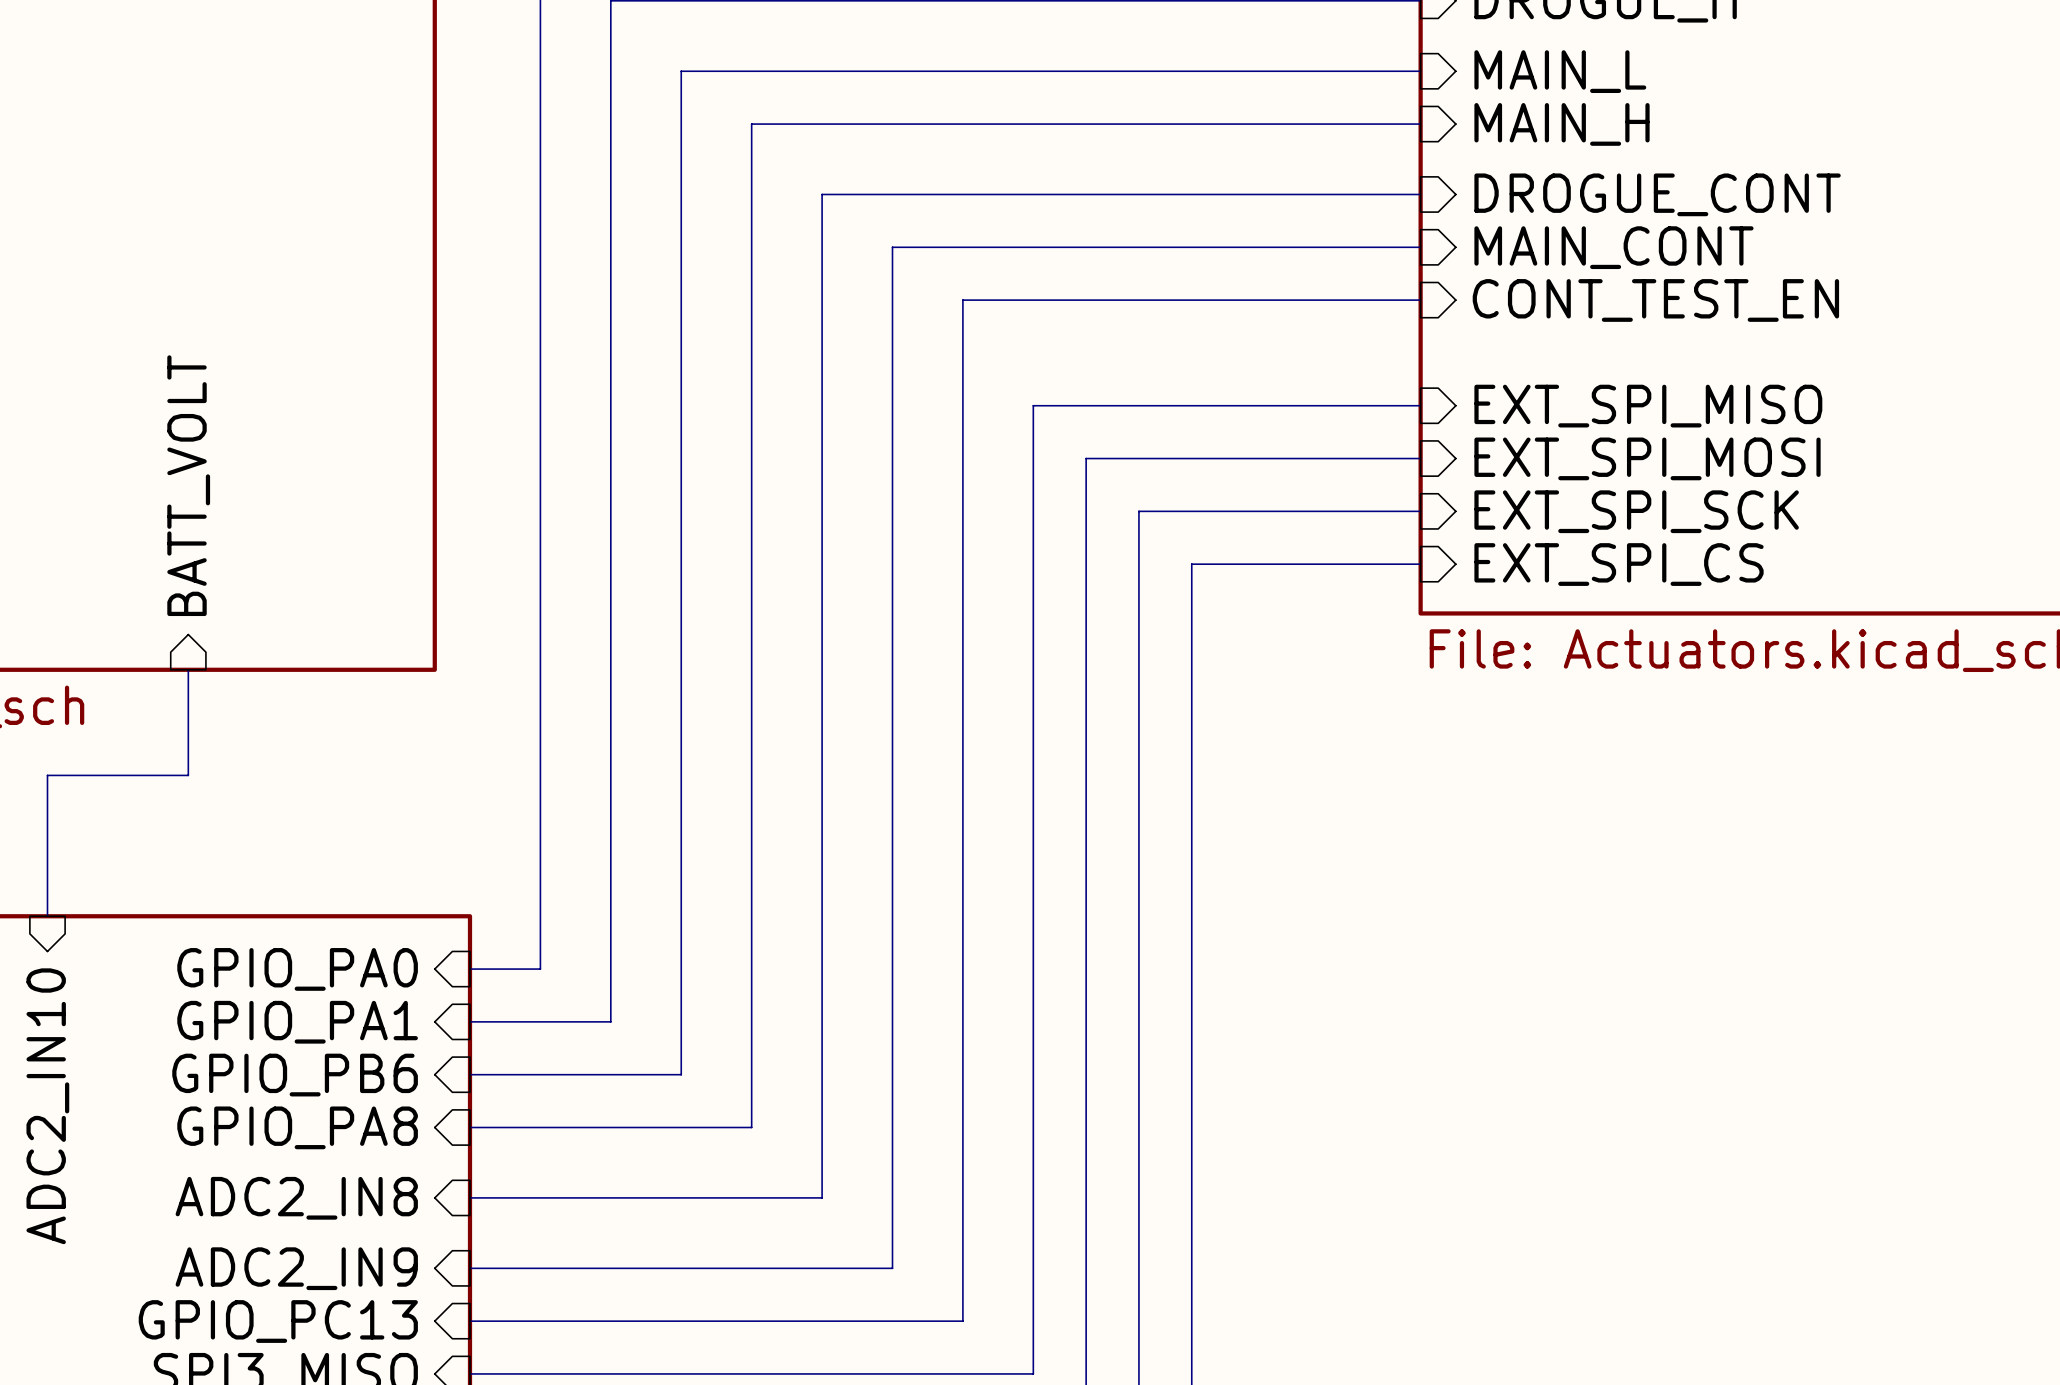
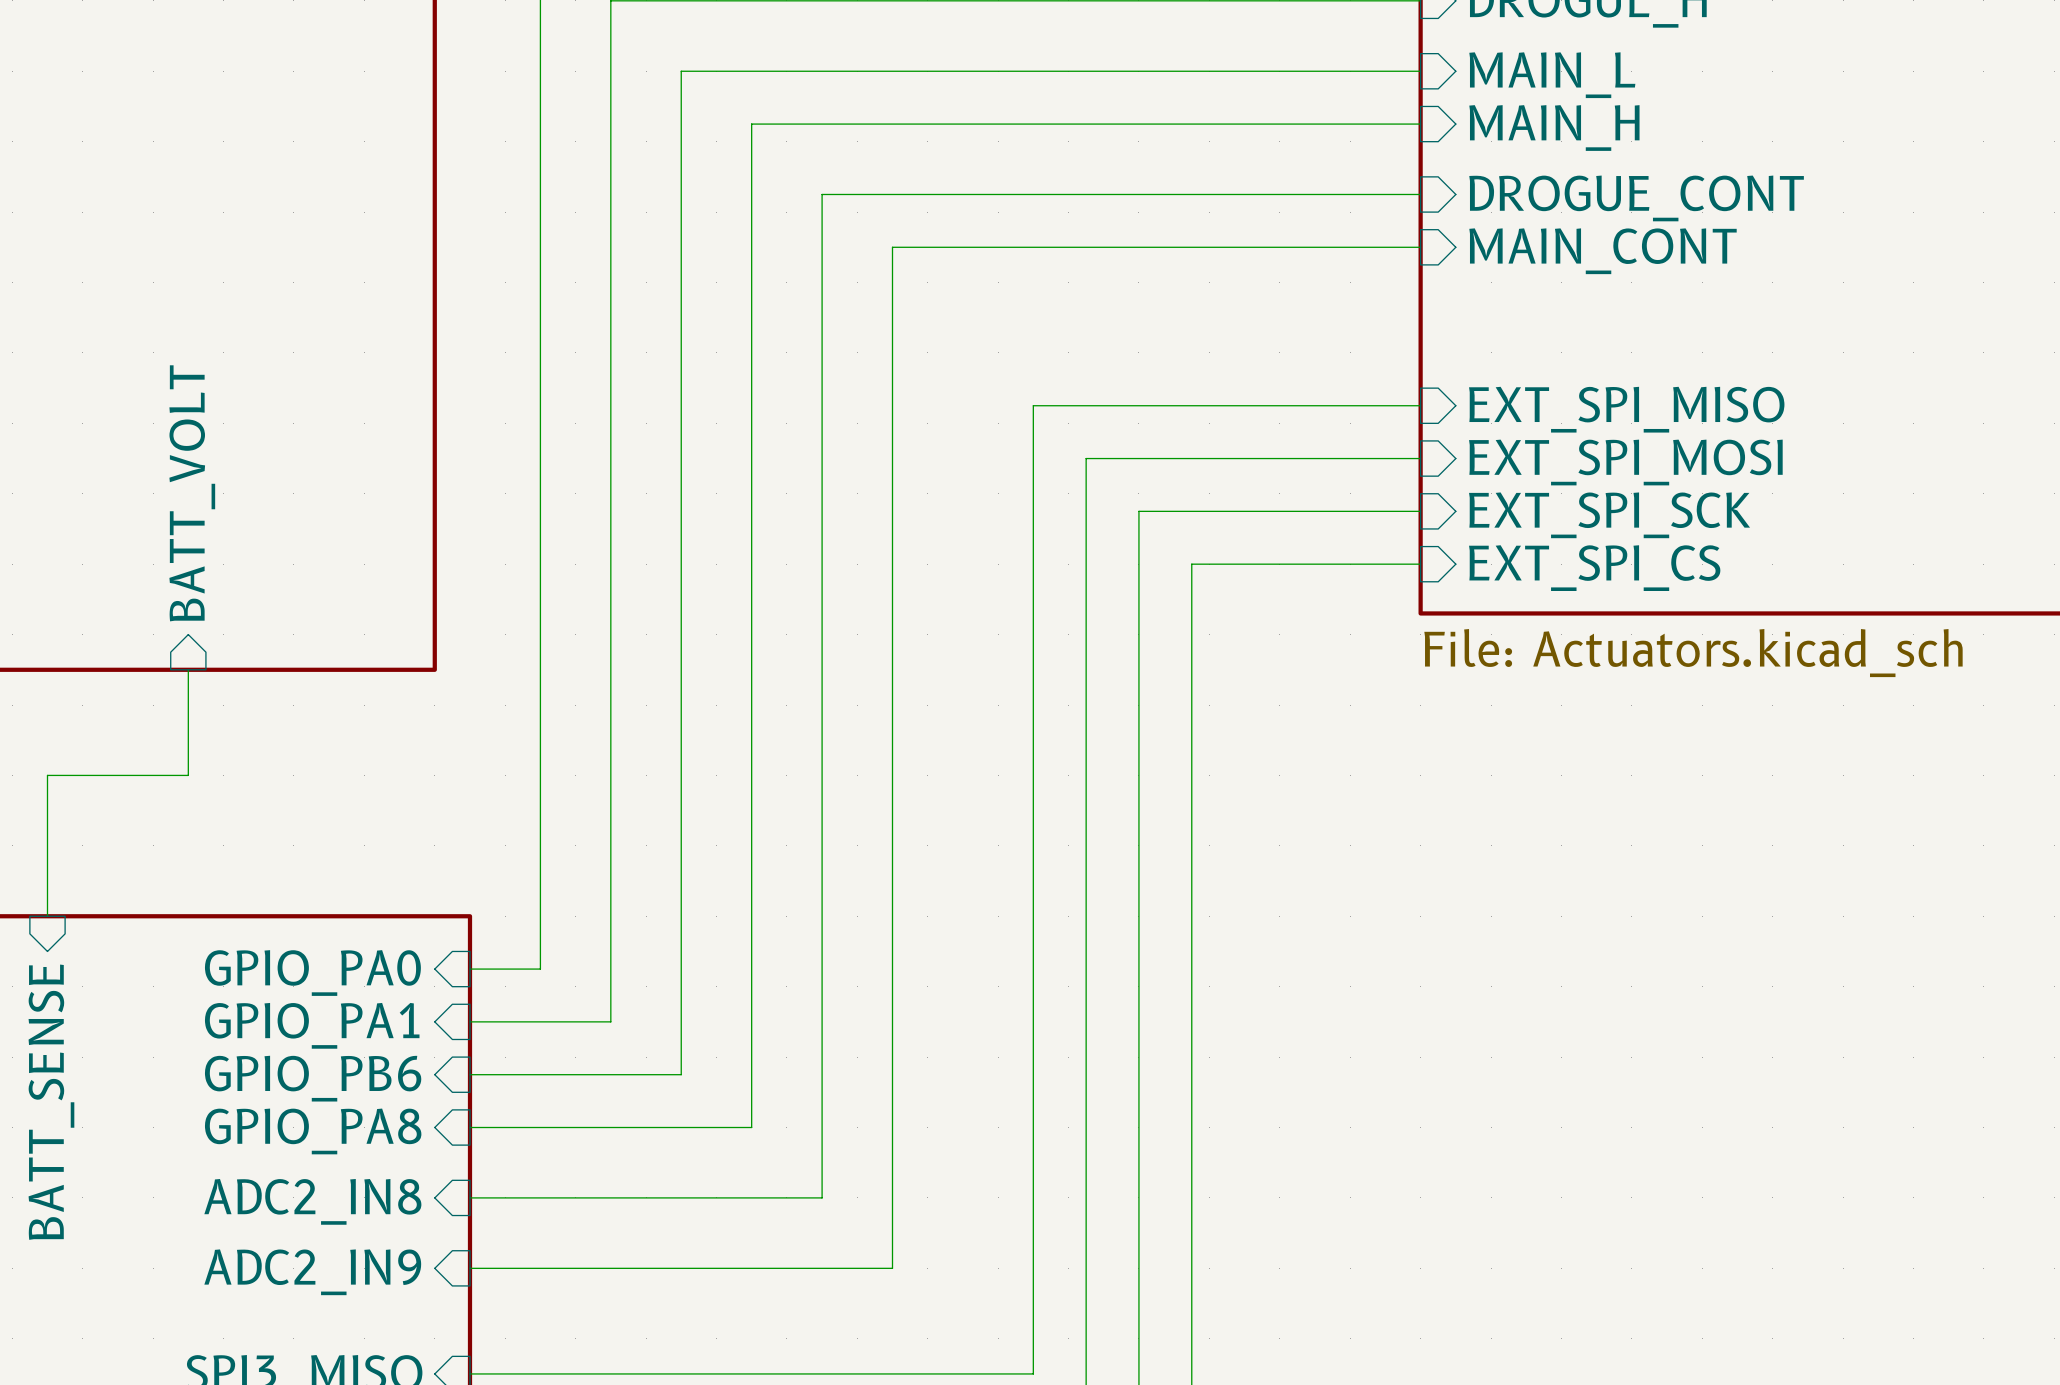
wire: (1420, 300) (962, 300) (962, 1321) (469, 1321) -> none
sheet pin: CONT_TEST_EN (1655, 300) -> none
sheet pin: ADC2_IN10 (47, 1106) -> BATT_SENSE (51, 1102)
sheet pin: GPIO_PC13 (278, 1321) -> none

